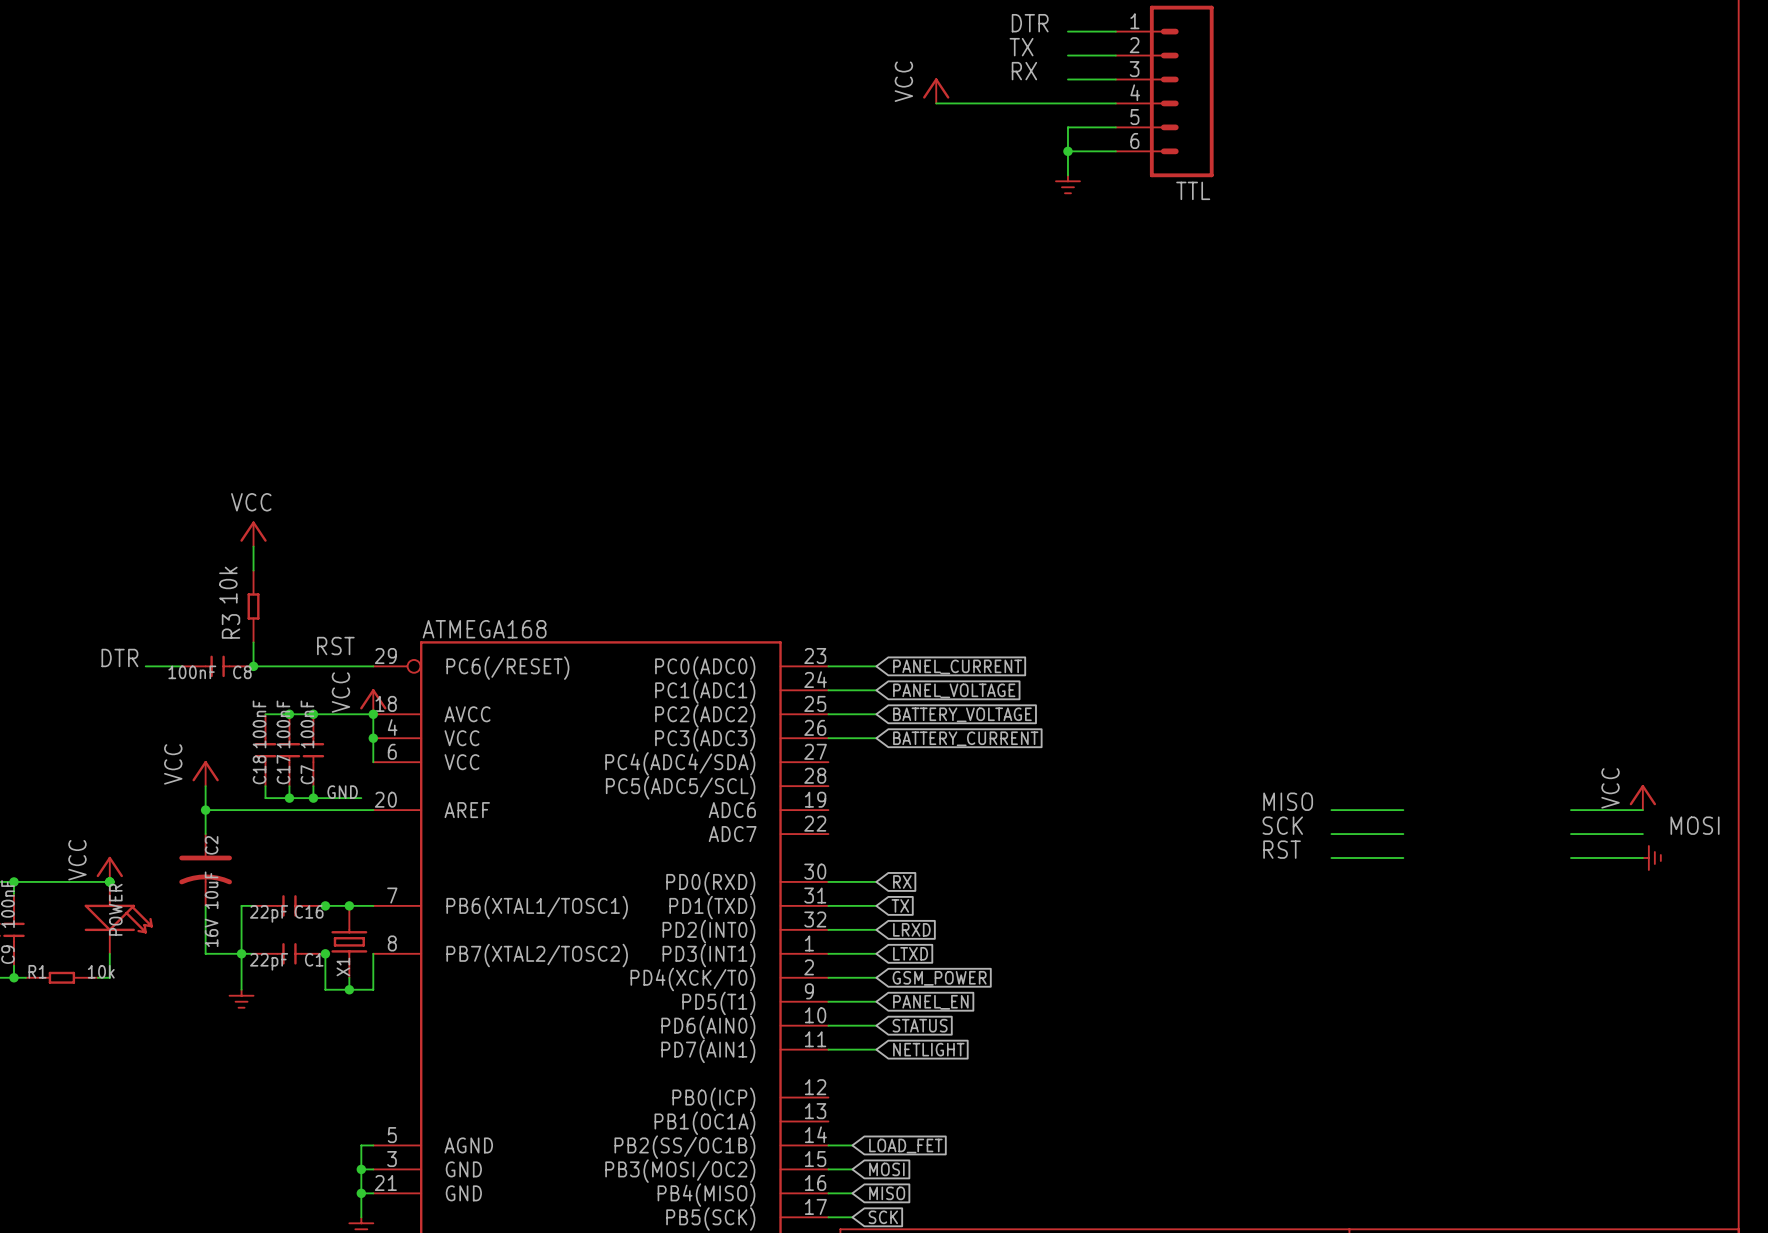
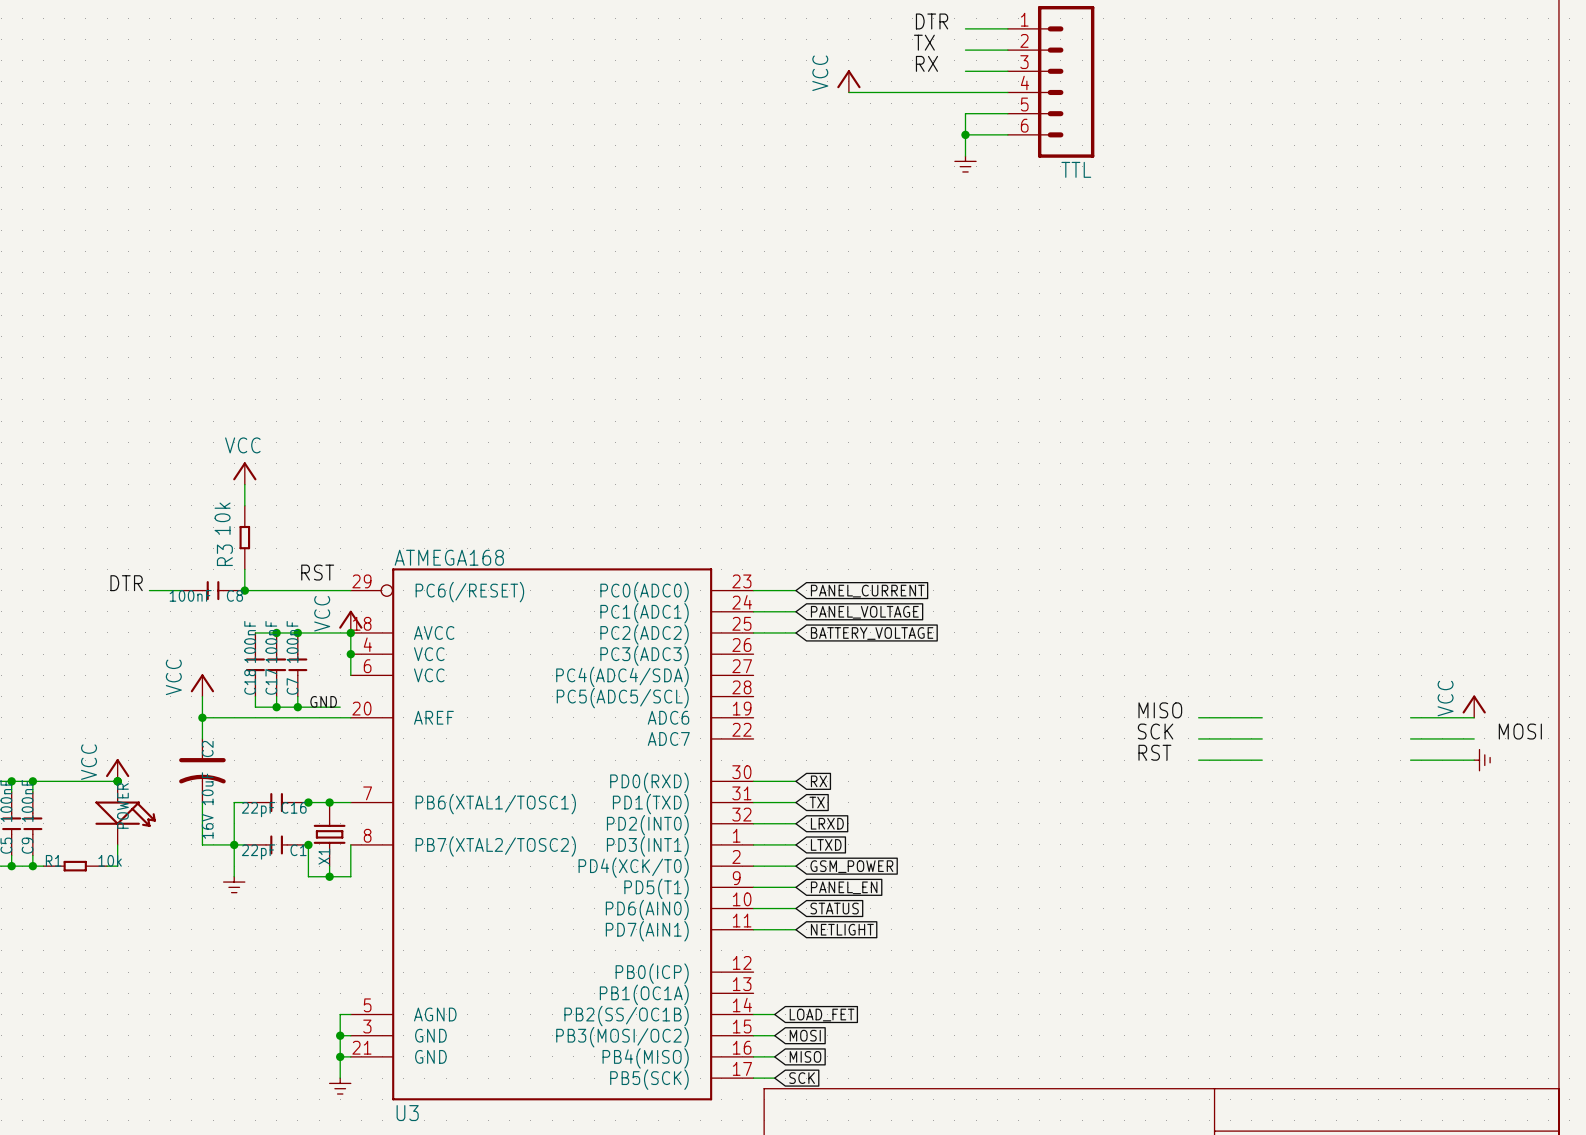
wire: (828, 738) (876, 738) -> none
global label: BATTERY_CURRENT (965, 738) -> none

